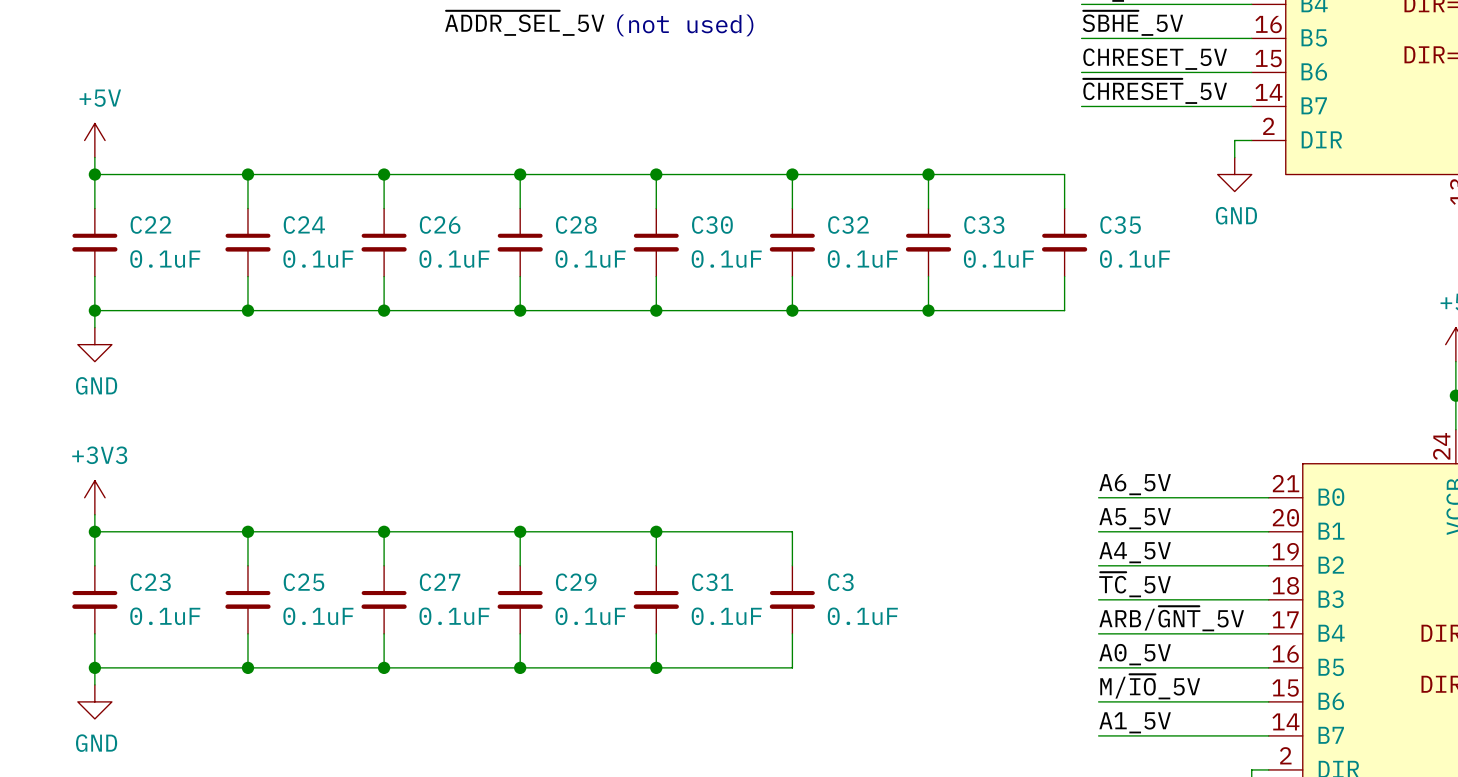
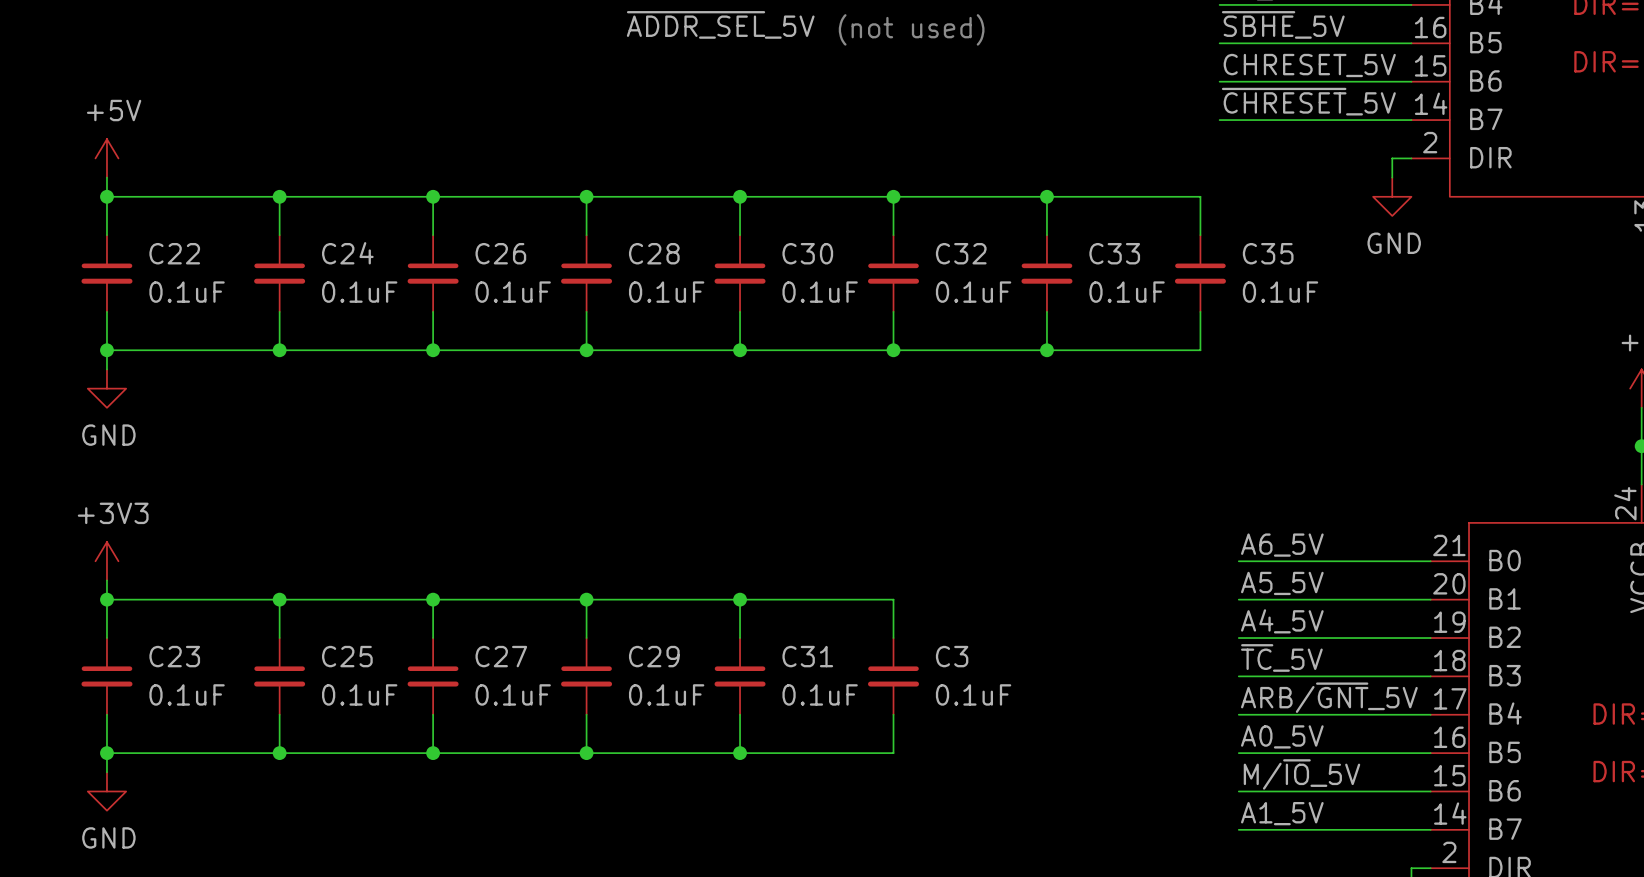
label position: ~{ADDR_SEL}_5V (524, 23) -> ~{ADDR_SEL}_5V (720, 24)
text position: (not used) (685, 25) -> (not used) (911, 29)

